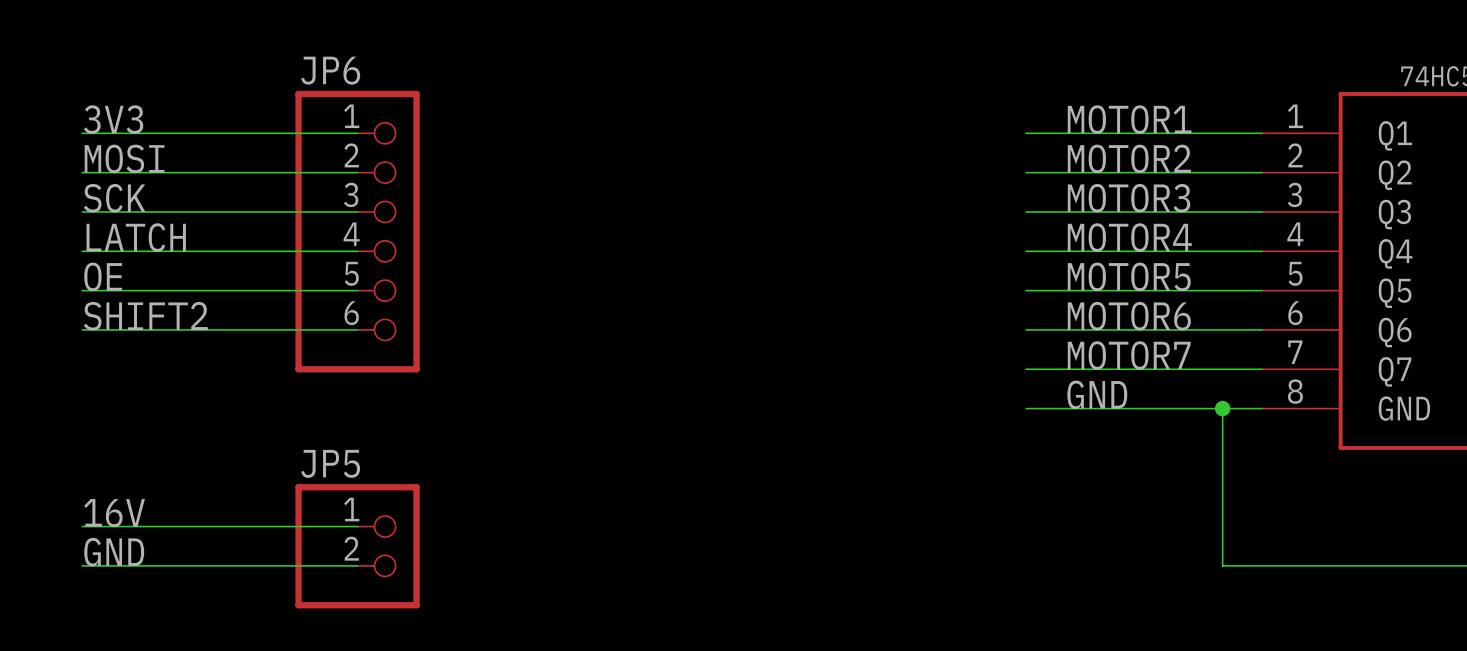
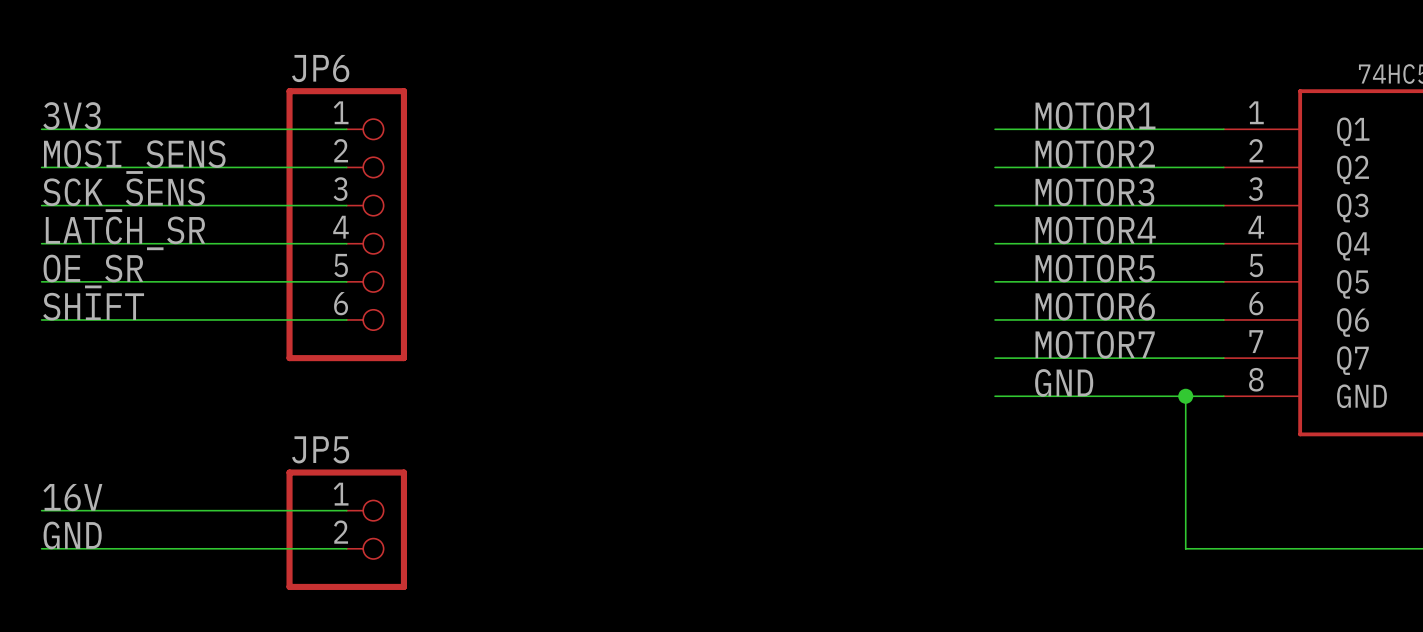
label position: 3V3 (113, 119) -> 3V3 (72, 115)
wire: none -> (41, 129) (79, 129)
label: MOSI (124, 158) -> MOSI_SENS (134, 157)
wire: none -> (41, 167) (79, 167)
label: SCK (114, 198) -> none
label: none -> SCK_SENS (124, 195)
wire: none -> (41, 205) (79, 205)
label: LATCH (136, 237) -> LATCH_SR (125, 233)
wire: none -> (41, 243) (79, 243)
label: OE (103, 276) -> none
label: none -> OE_SR (93, 271)
wire: none -> (41, 281) (79, 281)
label: SHIFT2 (145, 316) -> SHIFT (93, 306)
wire: none -> (41, 319) (79, 319)
label position: 16V (114, 513) -> 16V (72, 497)
wire: none -> (41, 510) (79, 510)
label position: GND (114, 552) -> GND (72, 535)
wire: none -> (41, 548) (79, 548)

